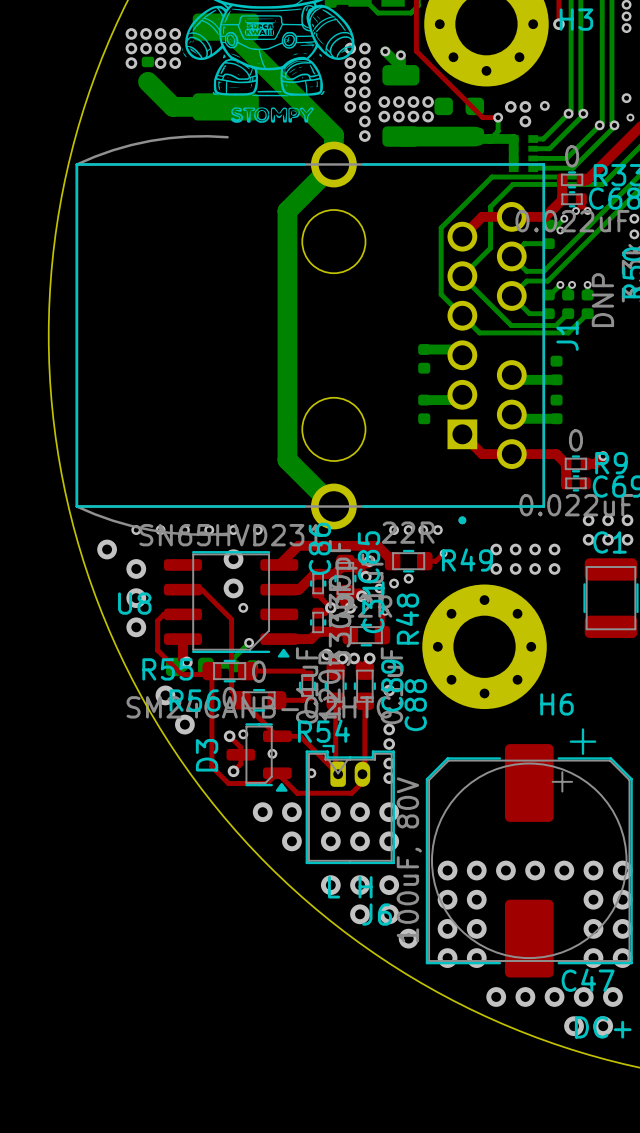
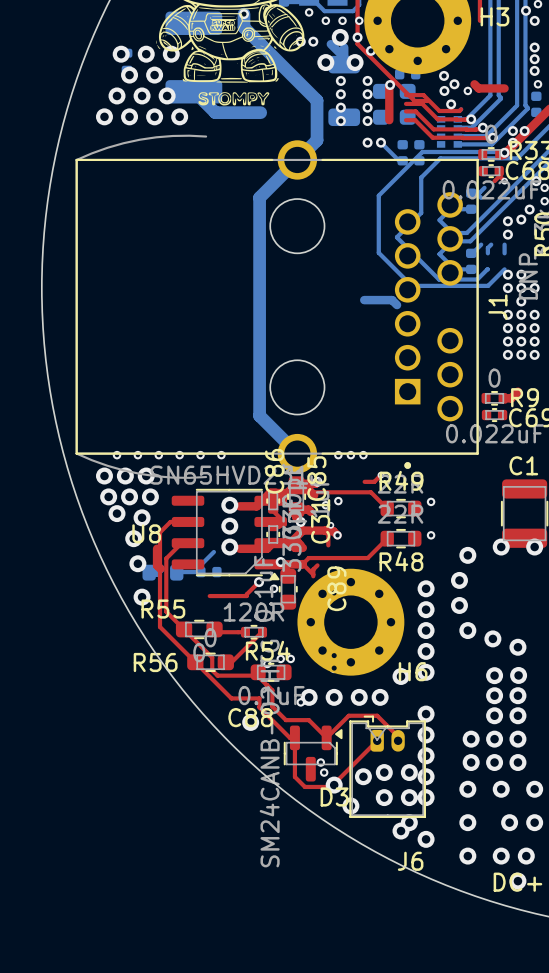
via: none -> (525, 10)
via: none -> (309, 12)
bottom track: none -> (243, 14) (243, 27) (317, 100) (317, 140) (259, 197) (259, 415) (297, 453)
via: none -> (243, 14)
via: (626, 16) -> none
via: none -> (325, 20)
via: none -> (342, 20)
via: none -> (359, 20)
via: (558, 24) -> none
via: none -> (534, 20)
bottom track: (225, 27) (333, 135) (333, 164) (287, 210) (287, 460) (333, 506) -> none
via: (626, 28) -> none
via: (131, 33) -> none
via: (146, 33) -> none
via: (160, 33) -> none
via: (175, 33) -> none
via: none -> (340, 37)
via: none -> (357, 37)
via: (131, 48) -> none
via: (146, 48) -> none
via: (160, 48) -> none
via: (175, 48) -> none
via: (385, 51) -> none
via: (400, 55) -> none
via: none -> (534, 47)
via: none -> (370, 50)
via: (131, 63) -> none
via: none -> (121, 54)
via: (160, 63) -> none
via: none -> (146, 54)
via: (175, 63) -> none
via: none -> (171, 54)
via: (350, 63) -> none
via: (364, 63) -> none
via: none -> (534, 59)
via: none -> (325, 62)
via: none -> (355, 62)
via: (350, 77) -> none
via: (364, 77) -> none
bottom track: (147, 81) (173, 106) (225, 106) -> (193, 91) (215, 112) (260, 112)
via: none -> (534, 70)
part: none -> (407, 74)
via: none -> (129, 75)
via: none -> (154, 75)
via: none -> (444, 75)
via: (350, 92) -> none
via: (364, 92) -> none
via: none -> (340, 80)
via: none -> (367, 80)
via: none -> (454, 84)
top track: none -> (474, 84) (478, 88) (504, 88)
top track: none -> (390, 85) (389, 120)
via: none -> (390, 85)
via: (384, 102) -> none
via: (398, 102) -> none
via: (413, 102) -> none
via: (428, 102) -> none
via: none -> (444, 90)
via: (350, 106) -> none
via: (364, 106) -> none
via: (510, 106) -> none
via: (525, 106) -> none
via: none -> (340, 94)
via: none -> (367, 94)
top track: none -> (406, 95) (423, 95) (439, 111) (459, 111) (461, 109)
via: none -> (117, 95)
via: none -> (142, 95)
via: none -> (167, 95)
via: (568, 113) -> none
via: (583, 113) -> none
via: (384, 116) -> none
via: (398, 116) -> none
via: (413, 116) -> none
via: (428, 116) -> none
bottom track: (498, 117) (498, 131) (490, 138) -> none
via: (498, 117) -> none
via: (630, 117) -> none
via: (364, 121) -> none
top track: none -> (406, 103) (422, 103) (437, 119) (471, 119)
part: none -> (536, 104)
via: none -> (340, 107)
via: none -> (367, 107)
via: (599, 125) -> none
via: (614, 125) -> none
top track: none -> (406, 111) (415, 111) (433, 129) (475, 129) (482, 127)
via: none -> (104, 116)
via: none -> (129, 116)
via: none -> (154, 116)
via: none -> (179, 116)
via: (364, 136) -> none
bottom track: (400, 136) (474, 136) (477, 138) (513, 138) (513, 167) -> none
top track: none -> (406, 120) (415, 120) (432, 137) (492, 137)
via: none -> (471, 119)
via: none -> (340, 121)
via: none -> (367, 121)
via: none -> (482, 127)
via: none -> (512, 131)
via: none -> (524, 131)
via: none -> (492, 137)
via: none -> (367, 142)
bottom track: none -> (380, 142) (399, 160)
via: none -> (380, 142)
via: none -> (512, 142)
part: none -> (402, 152)
part: none -> (419, 152)
via: none -> (504, 152)
top track: (562, 179) (562, 199) (545, 216) (482, 216) (462, 236) -> none
via: (575, 210) -> none
via: none -> (536, 181)
via: (564, 218) -> none
via: (560, 230) -> none
via: none -> (529, 209)
via: none -> (521, 219)
via: none -> (507, 221)
via: none -> (507, 234)
via: (560, 284) -> none
via: (572, 284) -> none
via: (587, 284) -> none
part: (568, 304) -> none
part: (587, 304) -> none
via: none -> (507, 274)
via: none -> (521, 274)
J1 position: (310, 335) -> (277, 306)
via: none -> (507, 288)
via: none -> (521, 288)
via: none -> (534, 288)
via: none -> (521, 301)
part: (424, 358) -> none
via: none -> (507, 314)
via: none -> (521, 314)
via: none -> (534, 314)
part: (556, 370) -> none
bottom track: (511, 375) (516, 379) (556, 379) -> none
via: none -> (507, 328)
via: none -> (521, 328)
via: none -> (534, 328)
bottom track: (462, 394) (457, 400) (424, 400) -> none
via: none -> (507, 341)
via: none -> (521, 341)
via: none -> (534, 341)
part: (424, 409) -> none
part: (556, 409) -> none
via: none -> (507, 354)
via: none -> (521, 354)
via: none -> (534, 354)
bottom track: (511, 414) (516, 418) (556, 418) -> none
top track: (462, 434) (482, 454) (556, 454) (566, 463) (566, 483) -> none
via: (603, 456) -> none
via: (588, 520) -> none
via: (608, 520) -> none
via: (627, 520) -> none
via: (437, 530) -> none
via: (588, 539) -> none
via: (608, 539) -> none
via: (627, 539) -> none
via: (107, 549) -> none
via: (496, 549) -> none
via: (515, 549) -> none
via: (535, 549) -> none
via: (554, 549) -> none
via: none -> (104, 476)
via: none -> (125, 476)
via: none -> (146, 476)
via: (233, 559) -> none
top track: (392, 561) (377, 545) (298, 545) (279, 564) -> none
R49 position: (408, 561) -> (401, 508)
via: (136, 568) -> none
via: (496, 568) -> none
via: (515, 568) -> none
via: (535, 568) -> none
via: (554, 568) -> none
via: (365, 576) -> none
via: none -> (108, 496)
via: none -> (129, 496)
via: none -> (150, 496)
via: (408, 578) -> none
top track: none -> (270, 500) (279, 492) (370, 492) (387, 508)
via: none -> (431, 501)
via: (233, 588) -> none
via: none -> (229, 505)
top track: (182, 589) (201, 589) (231, 619) (231, 690) (277, 736) -> (214, 629) (217, 632) (238, 632)
via: (361, 596) -> none
via: none -> (142, 517)
U8 position: (231, 604) -> (229, 534)
top track: none -> (188, 521) (170, 521) (160, 532) (160, 626) (231, 698) (259, 698) (259, 707) (289, 737) (294, 737) (294, 776) (304, 786) (331, 786) (377, 740)
via: (243, 607) -> none
via: (330, 607) -> none
via: none -> (229, 526)
top track: (182, 614) (164, 614) (157, 620) (157, 650) (181, 674) (208, 674) (211, 671) (211, 766) (228, 783) (267, 783) (277, 773) (297, 793) (351, 793) (362, 782) (362, 774) (364, 771) (364, 701) -> none
R48 name rotation: 0° (407, 619) -> 90° clockwise (401, 561)
top track: none -> (337, 535) (333, 531) (302, 530) (290, 543) (295, 547) (302, 547)
via: none -> (337, 535)
via: none -> (431, 535)
via position: (136, 627) -> (133, 538)
top track: none -> (387, 538) (367, 558) (308, 558) (302, 564) (270, 564)
top track: none -> (188, 543) (181, 543) (166, 558) (166, 611) (212, 657) (212, 670) (217, 675) (254, 675) (258, 672) (258, 676) (266, 685)
R48 position: (366, 635) -> (401, 538)
via: none -> (229, 547)
via: none -> (501, 547)
via: none -> (534, 547)
via: (249, 642) -> none
H6 position: (484, 646) -> (350, 622)
via: none -> (467, 555)
via: none -> (137, 563)
via: (342, 658) -> none
via: (354, 658) -> none
via: (369, 658) -> none
via: (186, 662) -> none
R55 name position: R55 (167, 669) -> R55 (163, 609)
R55 position: (229, 671) -> (199, 629)
top track: (247, 671) (302, 671) (307, 675) -> none
via: none -> (459, 580)
top track: none -> (259, 582) (246, 596) (209, 596)
via: none -> (259, 582)
R54 rotation: 0° (307, 685) -> 90° clockwise (254, 632)
R54 position: (307, 685) -> (254, 632)
via: none -> (274, 588)
via: none -> (426, 588)
C88 rotation: 0° (364, 686) -> 90° clockwise (271, 672)
C88 position: (364, 686) -> (271, 672)
top track: (307, 695) (302, 700) (276, 700) -> none
R56 position: (259, 700) -> (210, 662)
top track: (335, 701) (335, 771) -> none
via: none -> (459, 605)
via: none -> (426, 609)
via: (184, 724) -> none
via: (389, 729) -> none
via: (243, 734) -> none
via: none -> (426, 630)
via: none -> (467, 630)
top track: (229, 736) (240, 747) (240, 764) (233, 771) -> none
via: (229, 736) -> none
top track: (285, 736) (300, 736) (338, 774) -> none
top track: none -> (262, 632) (231, 662) (225, 662)
via: (389, 744) -> none
via: none -> (492, 638)
via: (272, 753) -> none
via: none -> (517, 647)
D3 rotation: 0° (259, 757) -> 90° counterclockwise (313, 753)
D3 position: (259, 757) -> (313, 753)
via: none -> (426, 651)
via: none -> (280, 658)
via: none -> (290, 658)
via: (233, 771) -> none
via: none -> (426, 672)
via: none -> (494, 675)
via: none -> (518, 675)
via: none -> (401, 676)
top track: none -> (267, 685) (272, 690) (272, 706) (285, 720) (308, 720) (326, 737) (348, 715) (377, 715) (398, 736) (398, 740)
J6 position: (350, 804) -> (387, 766)
via: none -> (494, 695)
via: none -> (517, 695)
via: (262, 812) -> none
via: (291, 812) -> none
via: (330, 812) -> none
via: none -> (359, 697)
via: none -> (380, 697)
via: none -> (300, 702)
via: none -> (426, 714)
via: none -> (494, 715)
via: none -> (517, 715)
via: (330, 841) -> none
via: (360, 841) -> none
via: (389, 841) -> none
C47: 100uF, 80V (529, 852) -> none
via: none -> (426, 734)
via: none -> (471, 739)
via: none -> (494, 739)
via: none -> (517, 739)
via: (447, 870) -> none
via: (476, 870) -> none
via: (505, 870) -> none
via: (535, 870) -> none
via: (564, 870) -> none
via: (593, 870) -> none
via: (622, 870) -> none
via size: [350, 875, 370, 896] -> [316, 758, 326, 767]
via size: [379, 875, 400, 896] -> [319, 768, 329, 777]
via: none -> (426, 755)
via: (330, 885) -> none
text: L H (350, 887) -> none
via: none -> (471, 762)
via: none -> (494, 762)
via: none -> (517, 762)
via: (593, 899) -> none
via: (622, 899) -> none
via: none -> (363, 776)
via: none -> (426, 776)
via: (360, 914) -> none
via: none -> (467, 789)
via: none -> (501, 789)
via: none -> (534, 789)
via: none -> (426, 797)
via: (593, 928) -> none
via: (622, 928) -> none
via: (447, 958) -> none
via: none -> (467, 822)
via: none -> (401, 831)
via position: (496, 996) -> (426, 839)
via: (525, 996) -> none
via: none -> (467, 856)
via: (554, 996) -> none
via: (574, 1026) -> none

